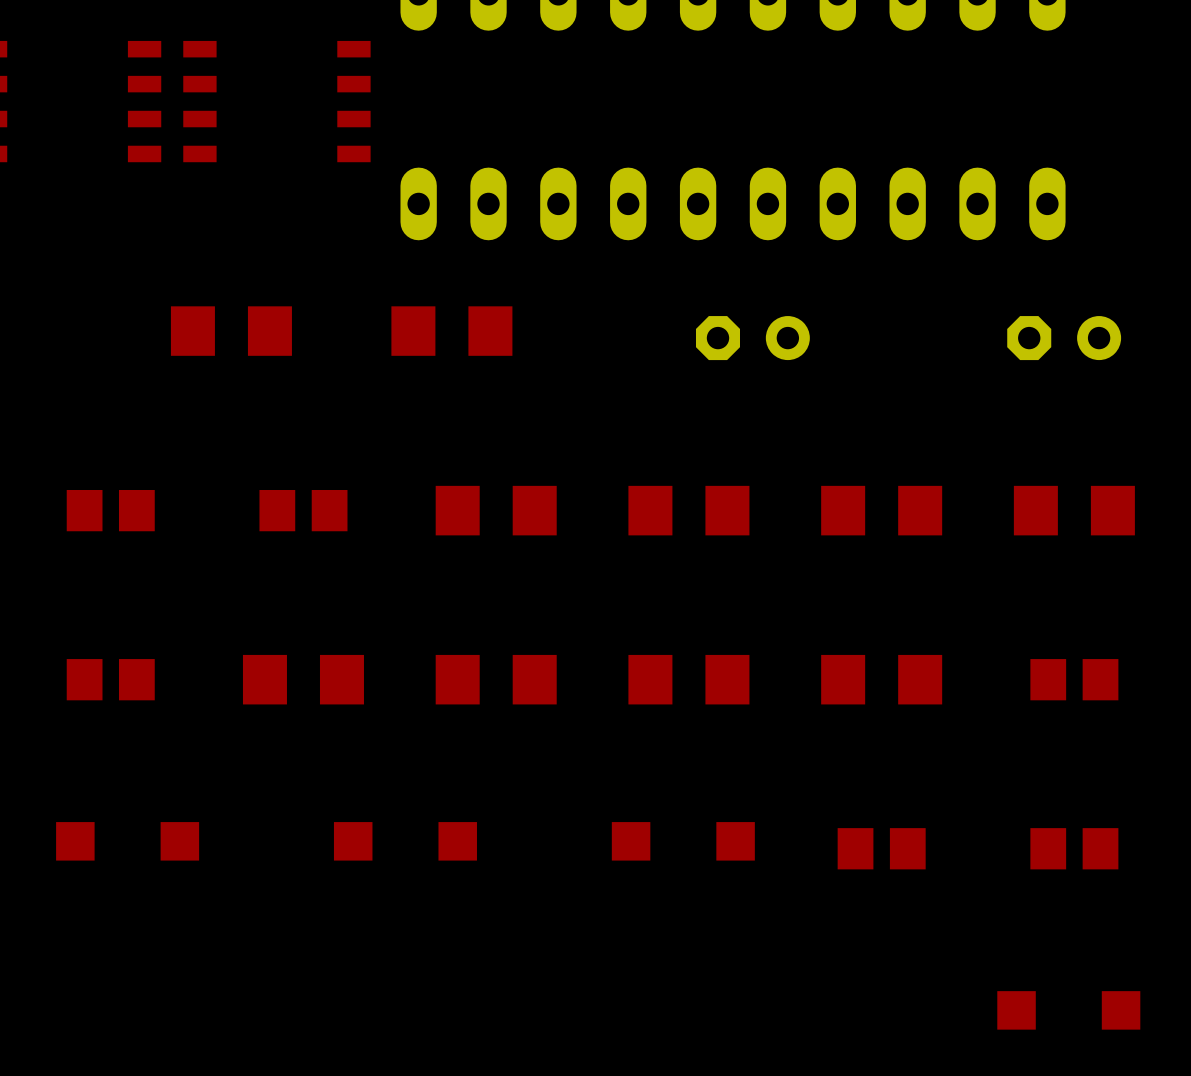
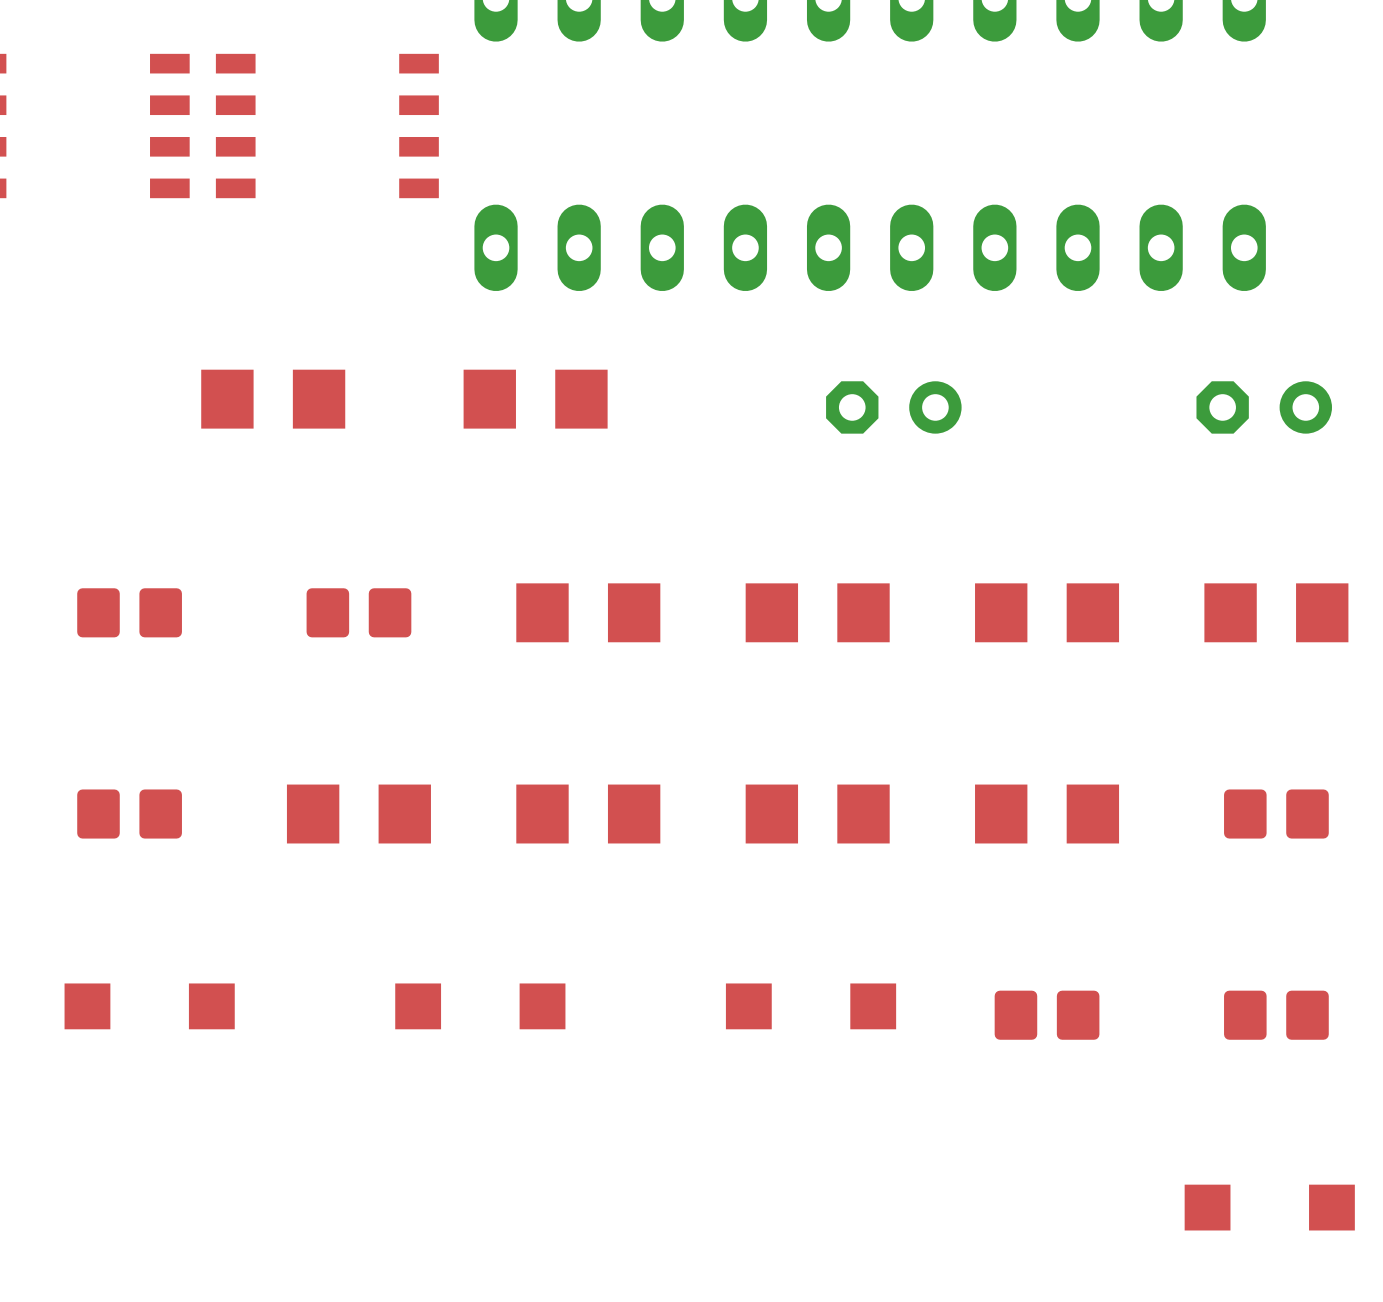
part footprint: [66, 489, 155, 532] -> [77, 588, 182, 638]
part footprint: [259, 489, 348, 532] -> [306, 588, 412, 638]
part footprint: [66, 659, 155, 701] -> [77, 789, 182, 839]
part footprint: [1030, 659, 1119, 701] -> [1224, 789, 1329, 839]
part footprint: [837, 828, 926, 870] -> [994, 990, 1100, 1040]
part footprint: [1030, 828, 1119, 870] -> [1224, 990, 1329, 1040]

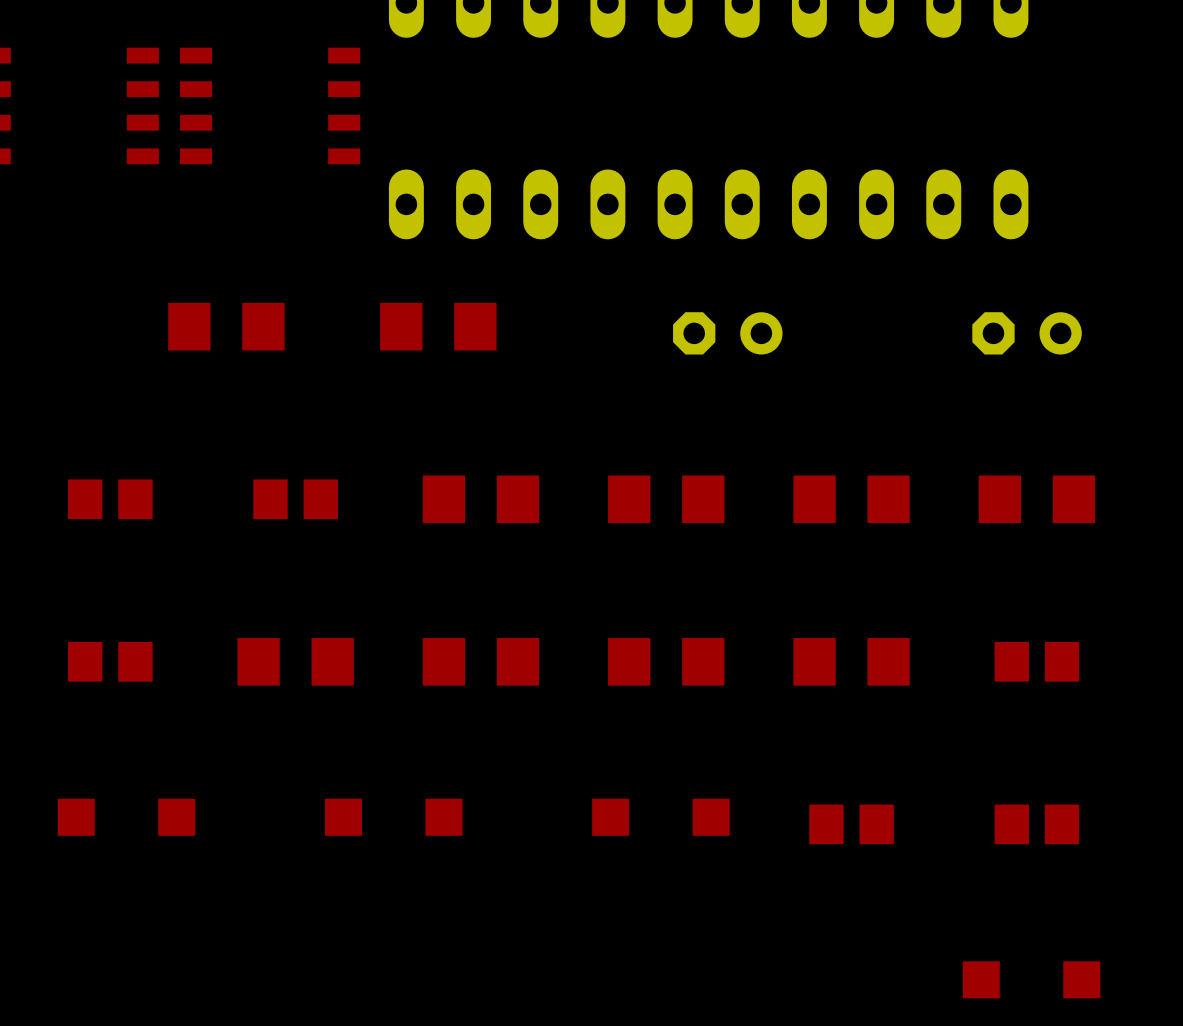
part footprint: [77, 588, 182, 638] -> [68, 479, 153, 520]
part footprint: [306, 588, 412, 638] -> [253, 479, 338, 520]
part footprint: [77, 789, 182, 839] -> [68, 642, 153, 682]
part footprint: [1224, 789, 1329, 839] -> [994, 642, 1080, 682]
part footprint: [994, 990, 1100, 1040] -> [809, 804, 894, 845]
part footprint: [1224, 990, 1329, 1040] -> [994, 804, 1080, 845]

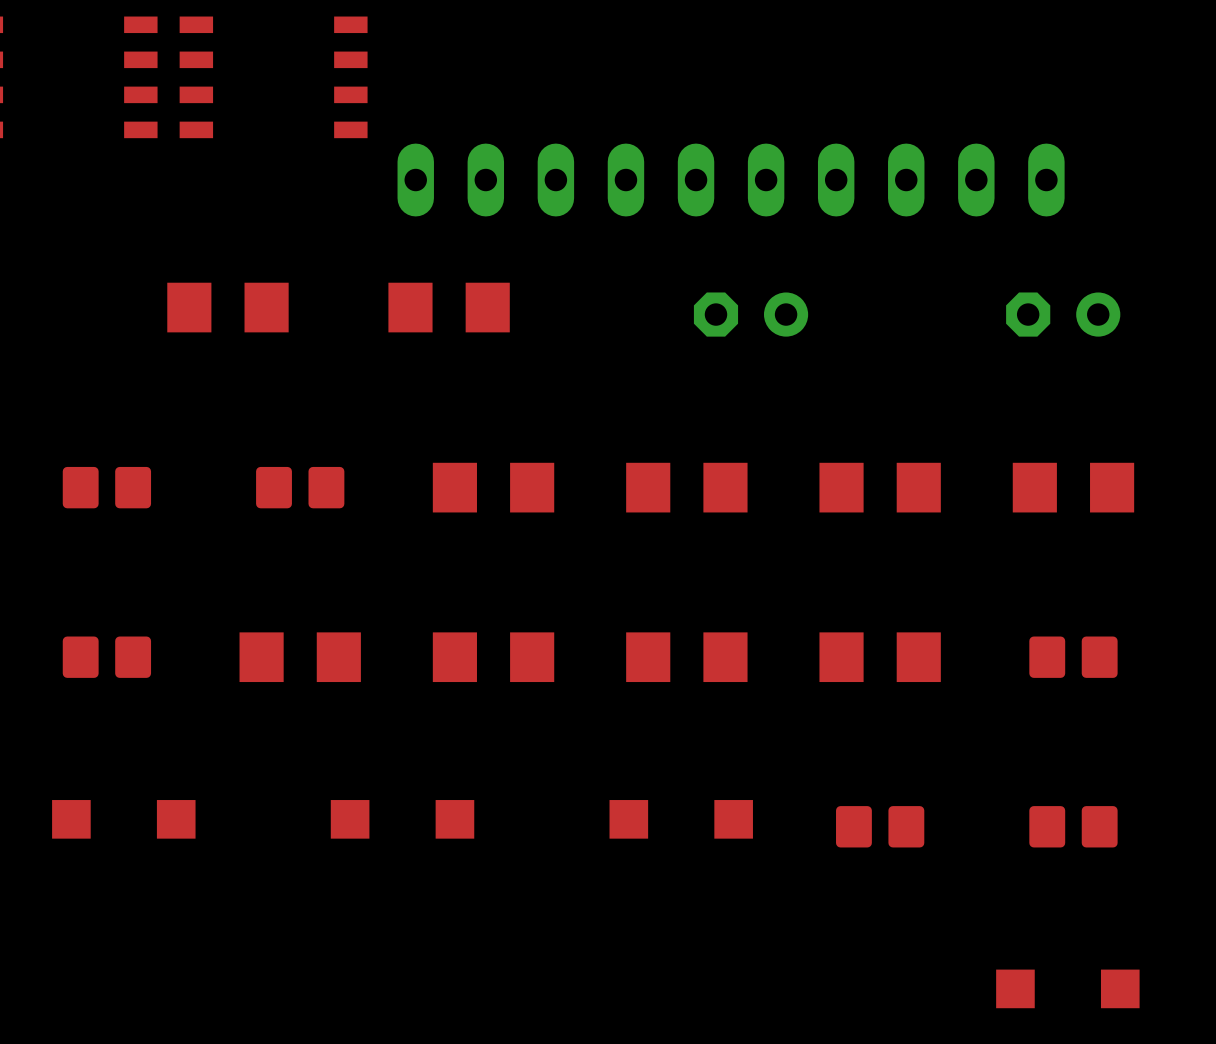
part footprint: [68, 479, 153, 520] -> [62, 466, 152, 509]
part footprint: [253, 479, 338, 520] -> [256, 466, 345, 509]
part footprint: [68, 642, 153, 682] -> [62, 636, 152, 678]
part footprint: [994, 642, 1080, 682] -> [1029, 636, 1118, 678]
part footprint: [809, 804, 894, 845] -> [836, 806, 925, 848]
part footprint: [994, 804, 1080, 845] -> [1029, 806, 1118, 848]

